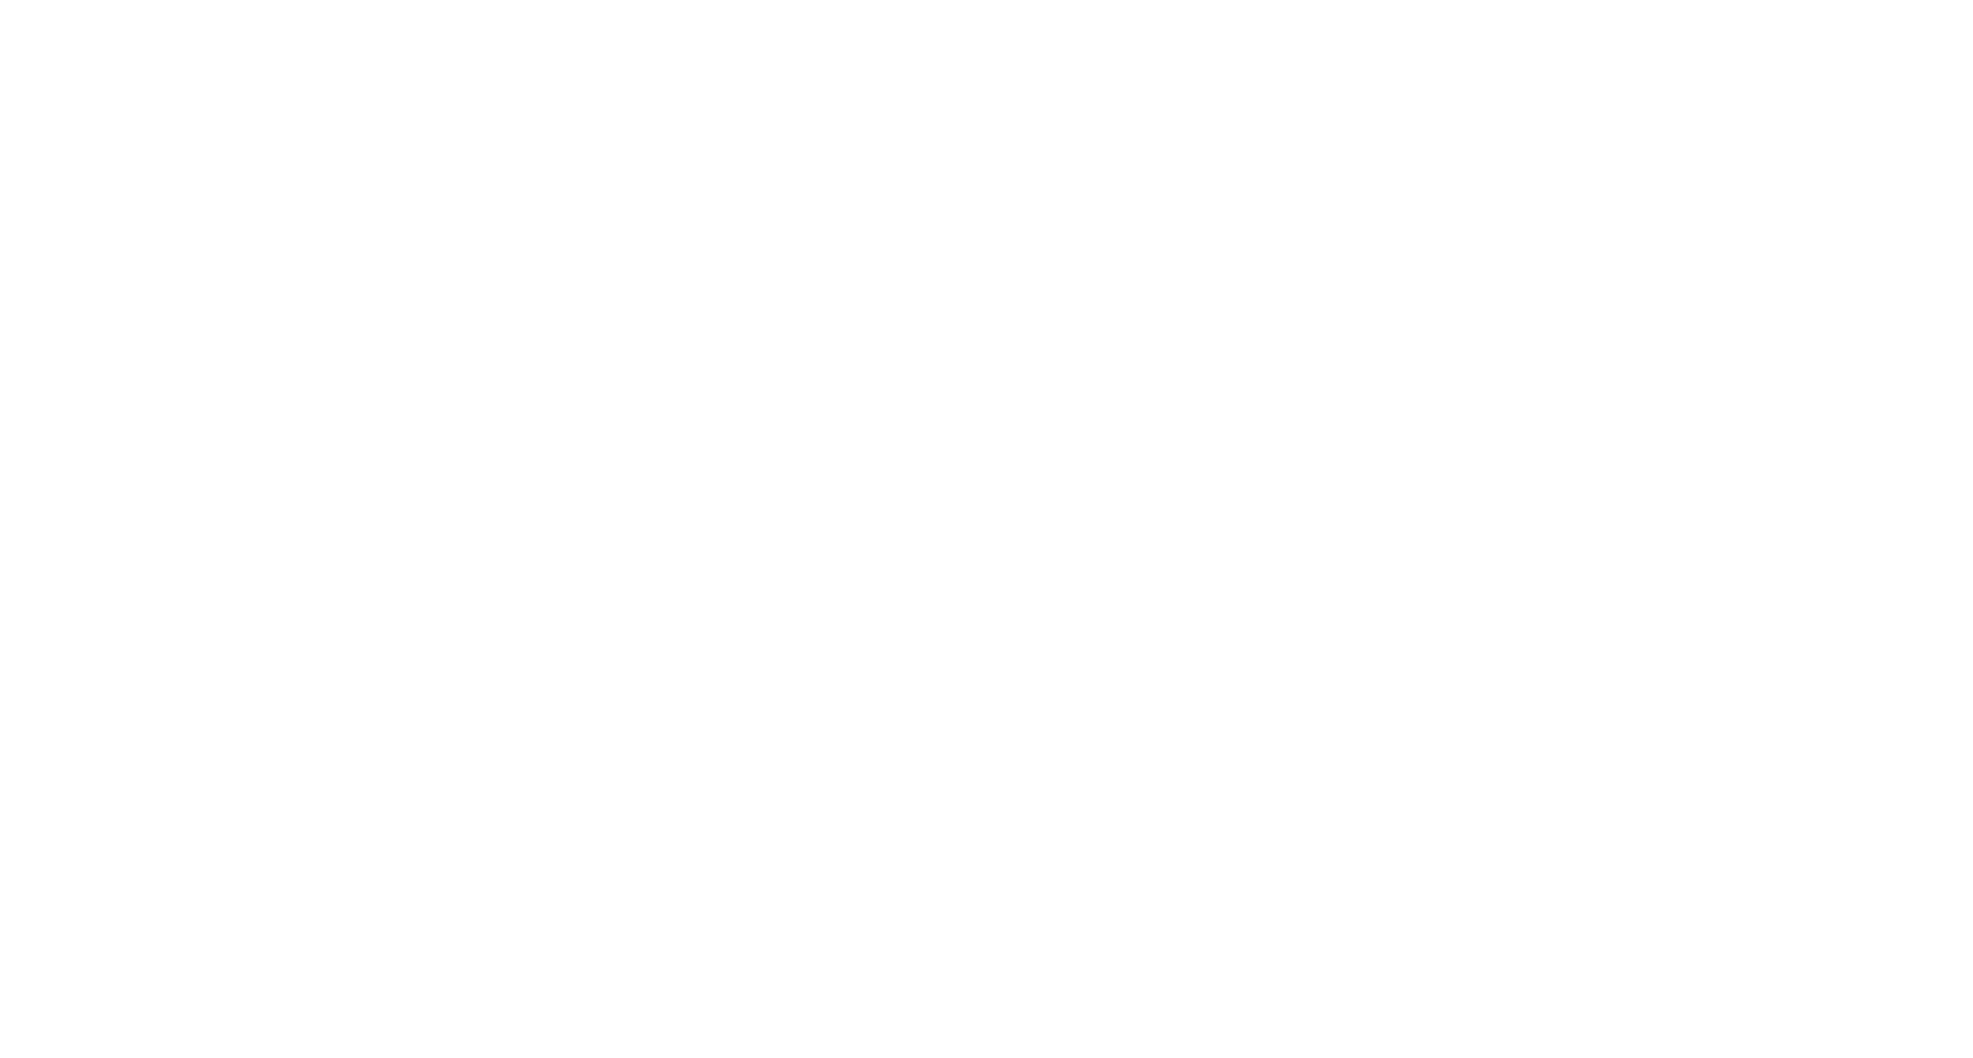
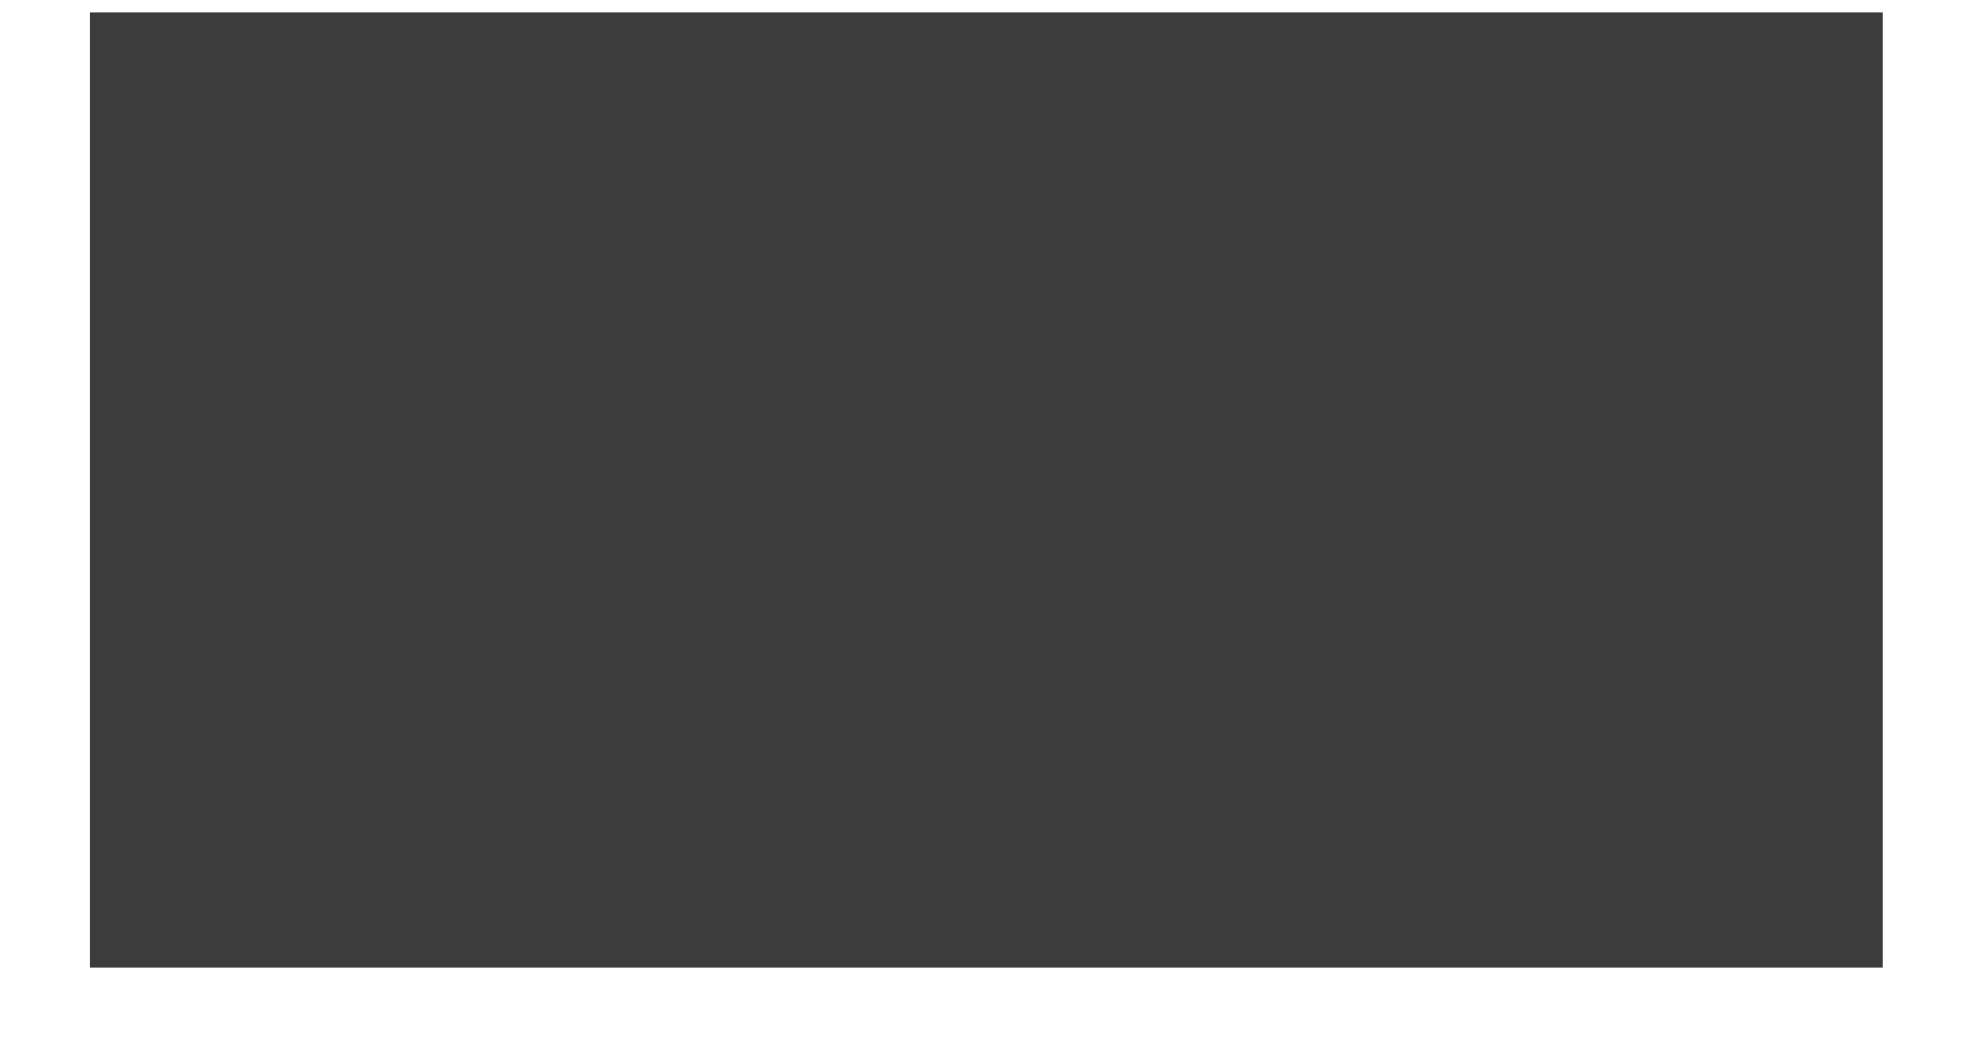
drawing: none -> [89, 12, 1883, 968]

